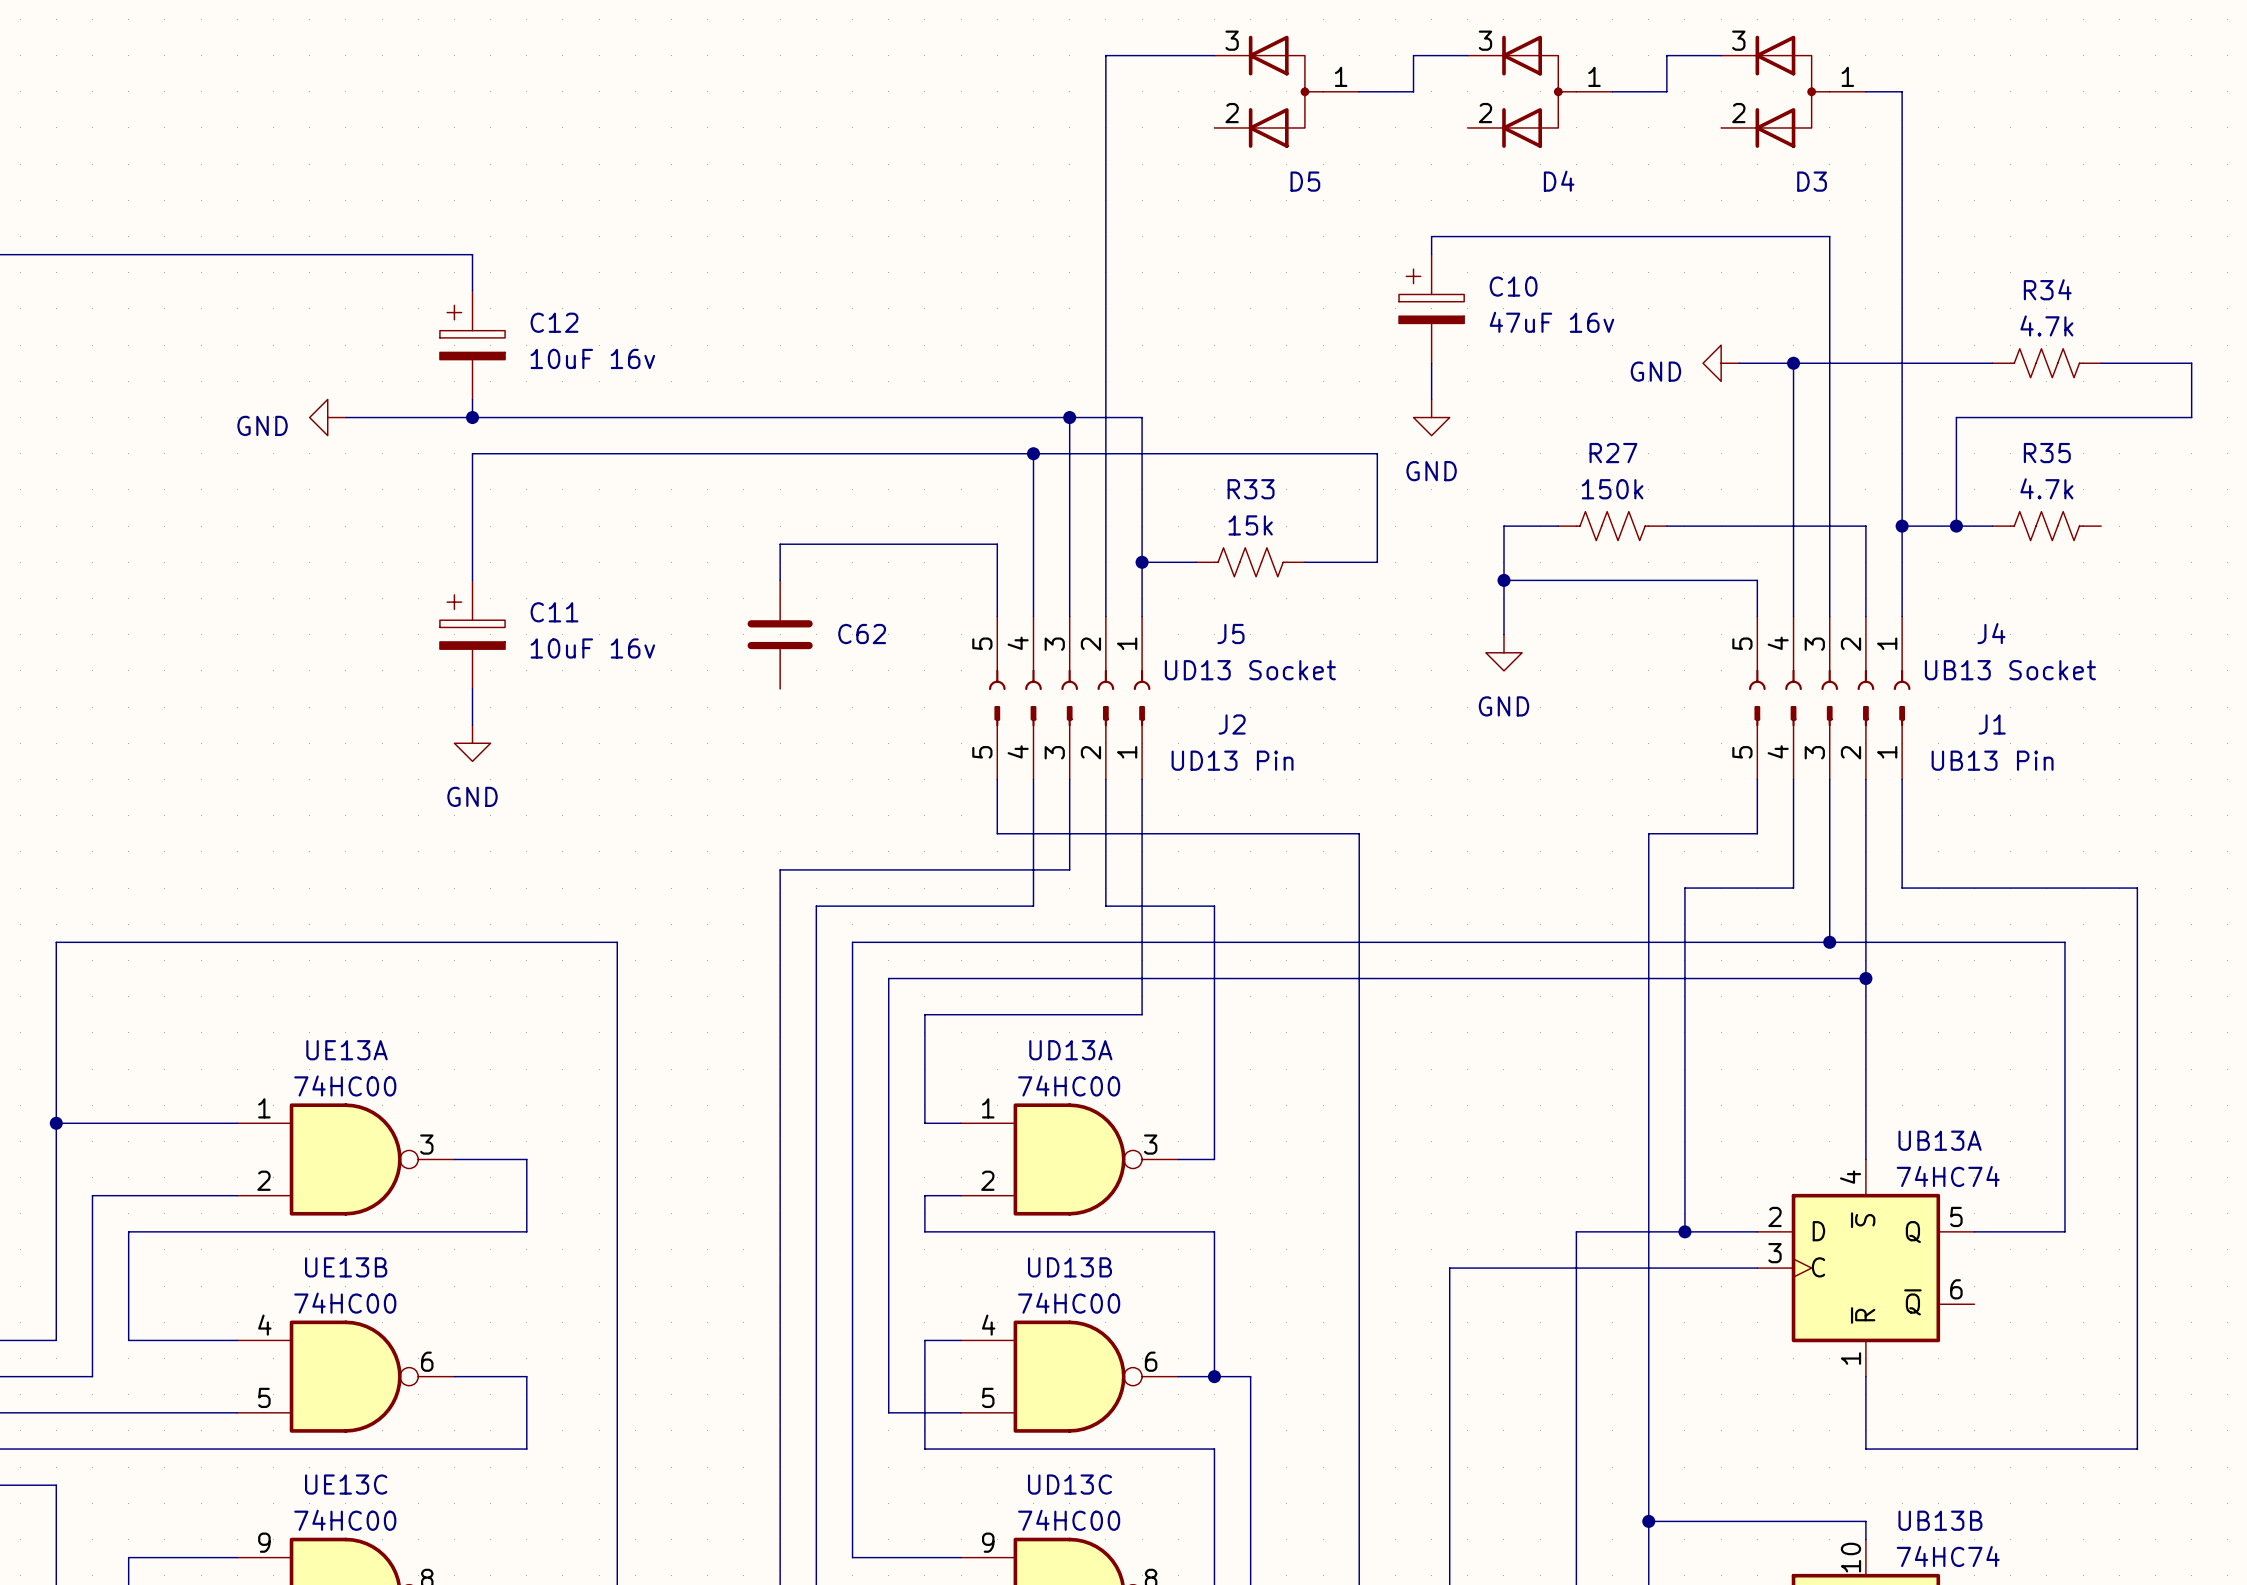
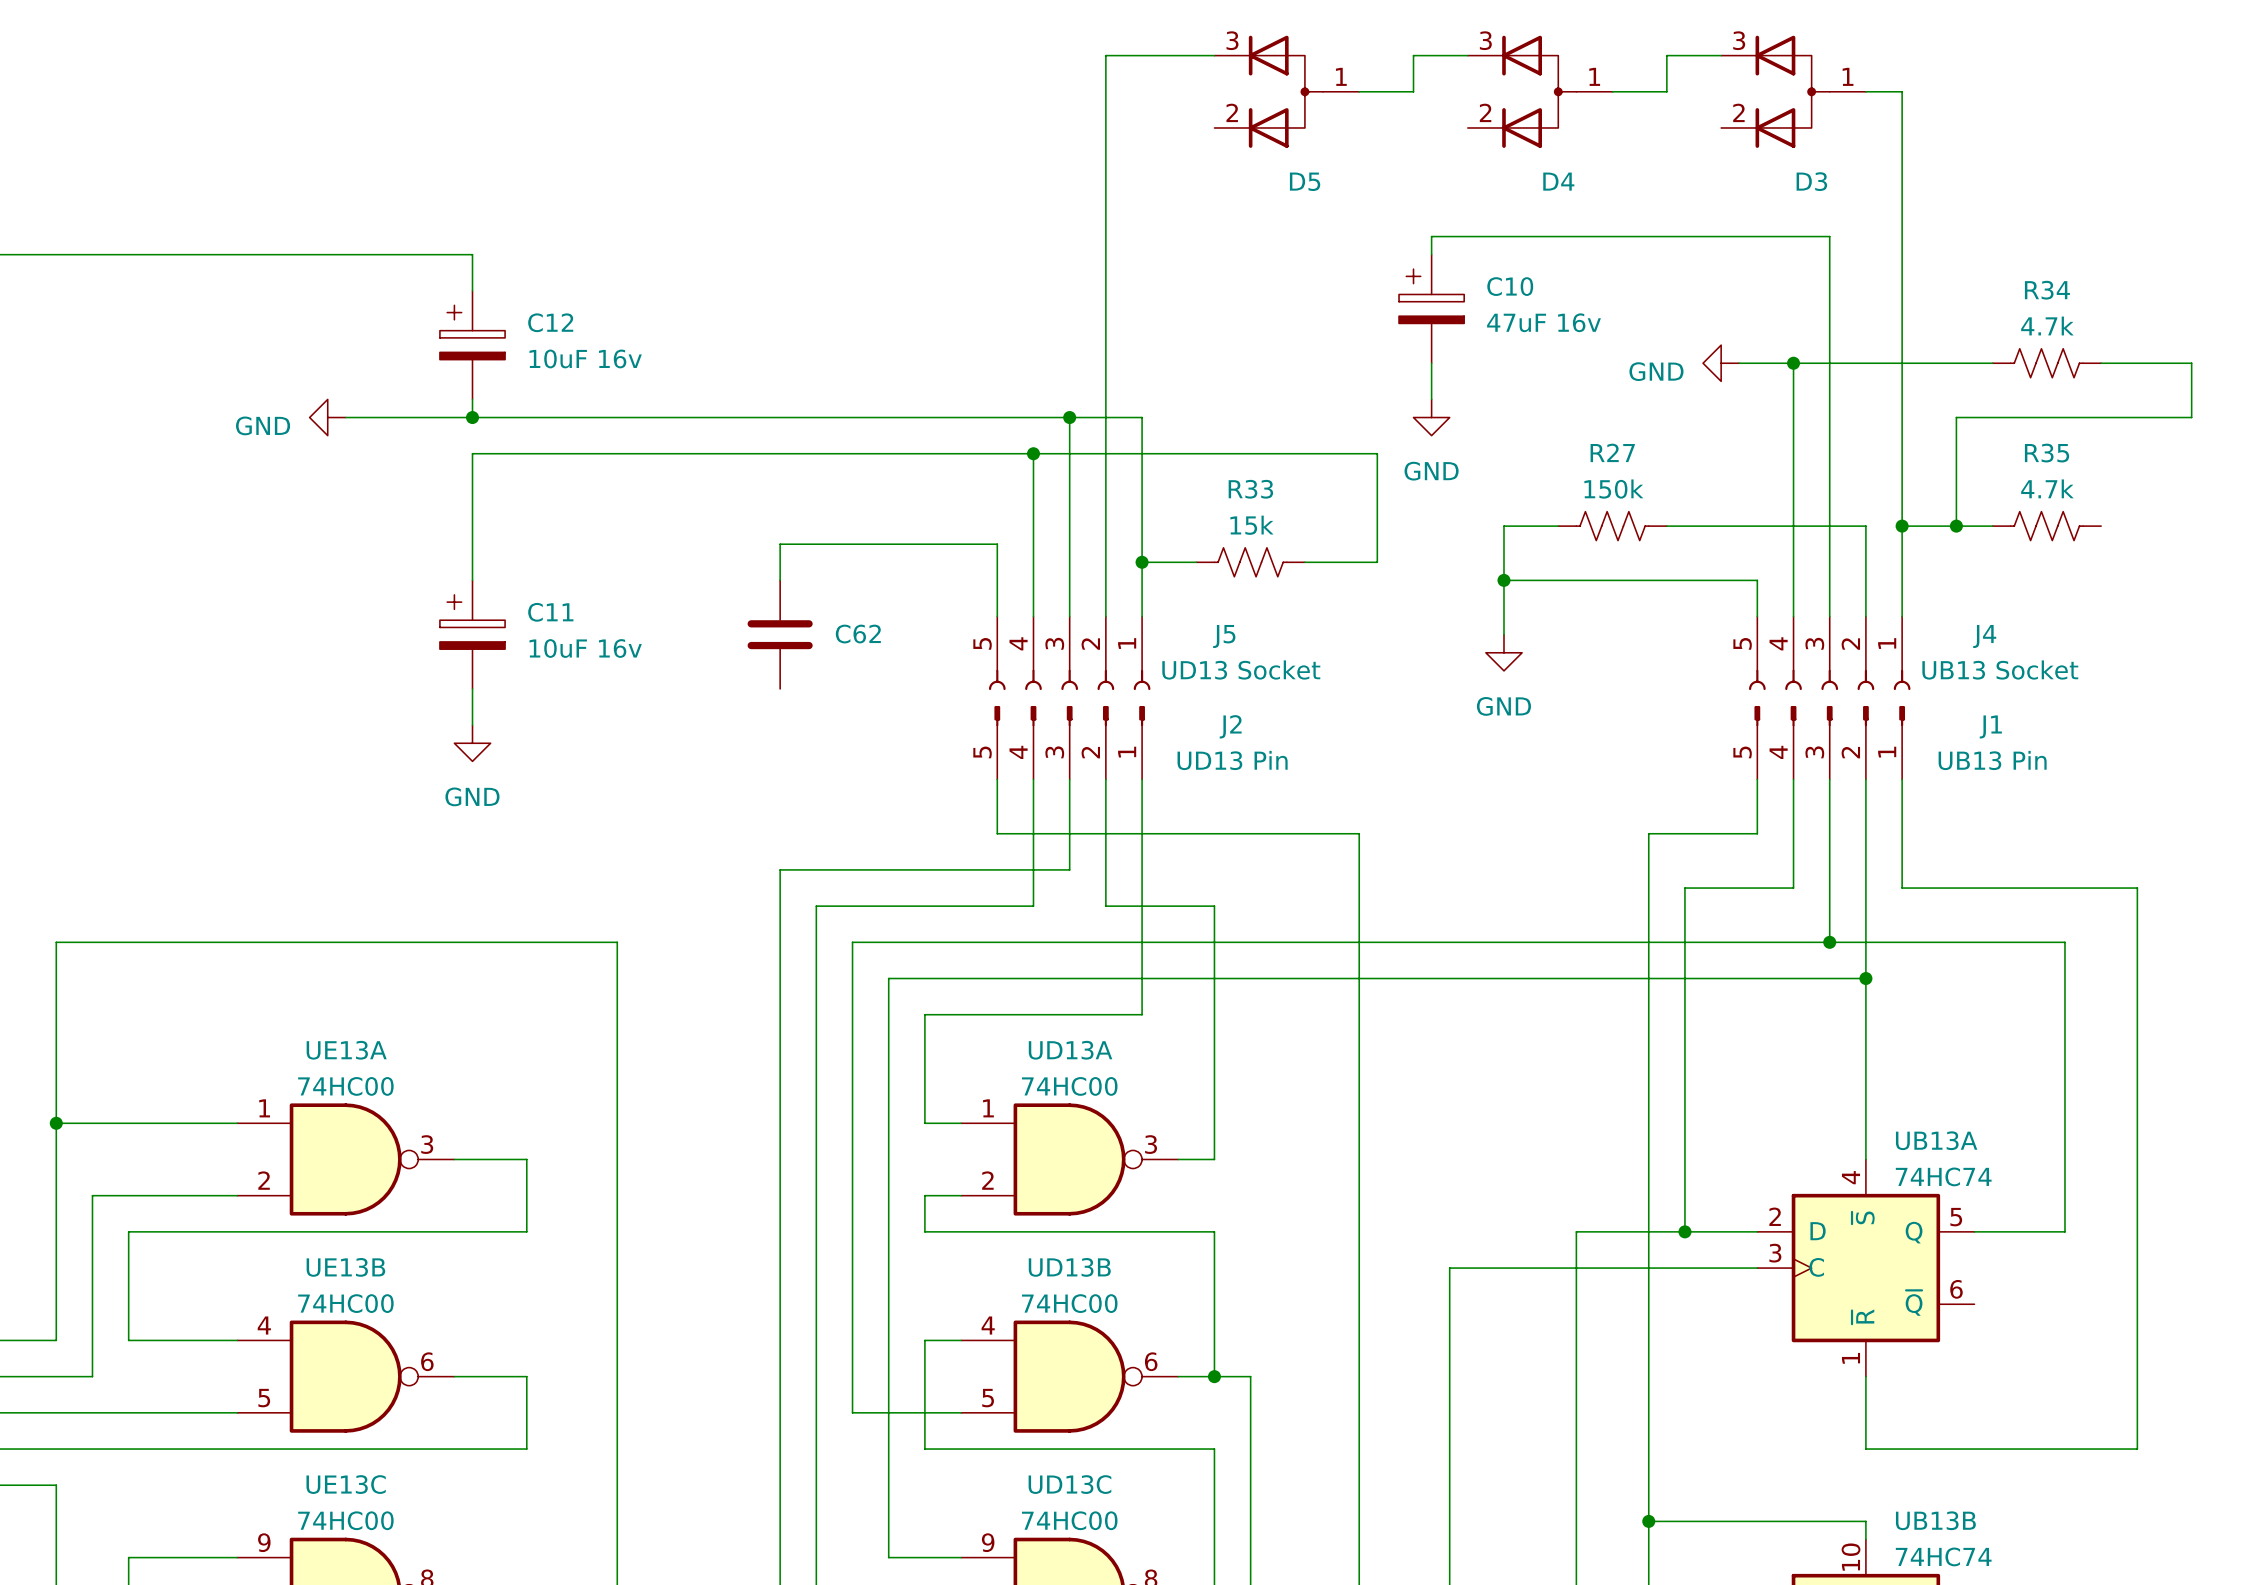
wire: (852, 1412) (852, 1557) (888, 1557) -> (852, 1412) (888, 1412) (888, 1557)

